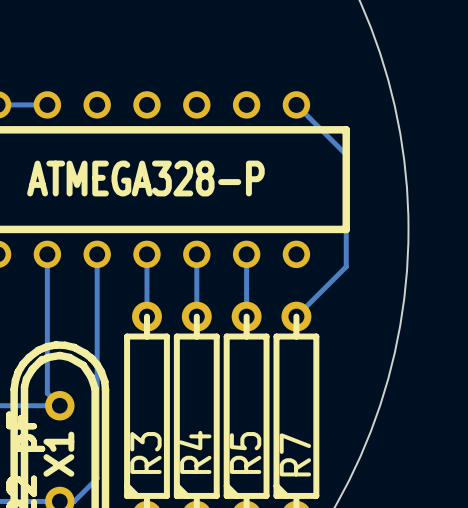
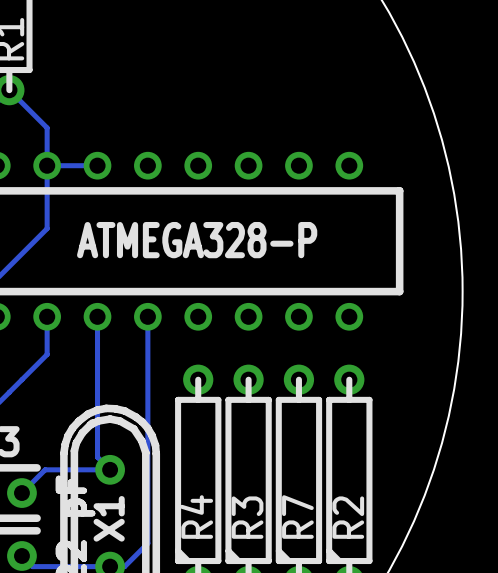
bottom track: (296, 104) (346, 154) (346, 266) (296, 316) -> none
bottom track: (146, 254) (146, 316) -> none
bottom track: (196, 254) (196, 316) -> none
bottom track: (246, 254) (246, 316) -> none
R4 name: R4 (195, 452) -> R3 (247, 517)
R3 name: R3 (145, 453) -> R4 (196, 517)
R5 name: R5 (245, 453) -> R7 (297, 517)
R7 name: R7 (295, 454) -> R2 (348, 517)

